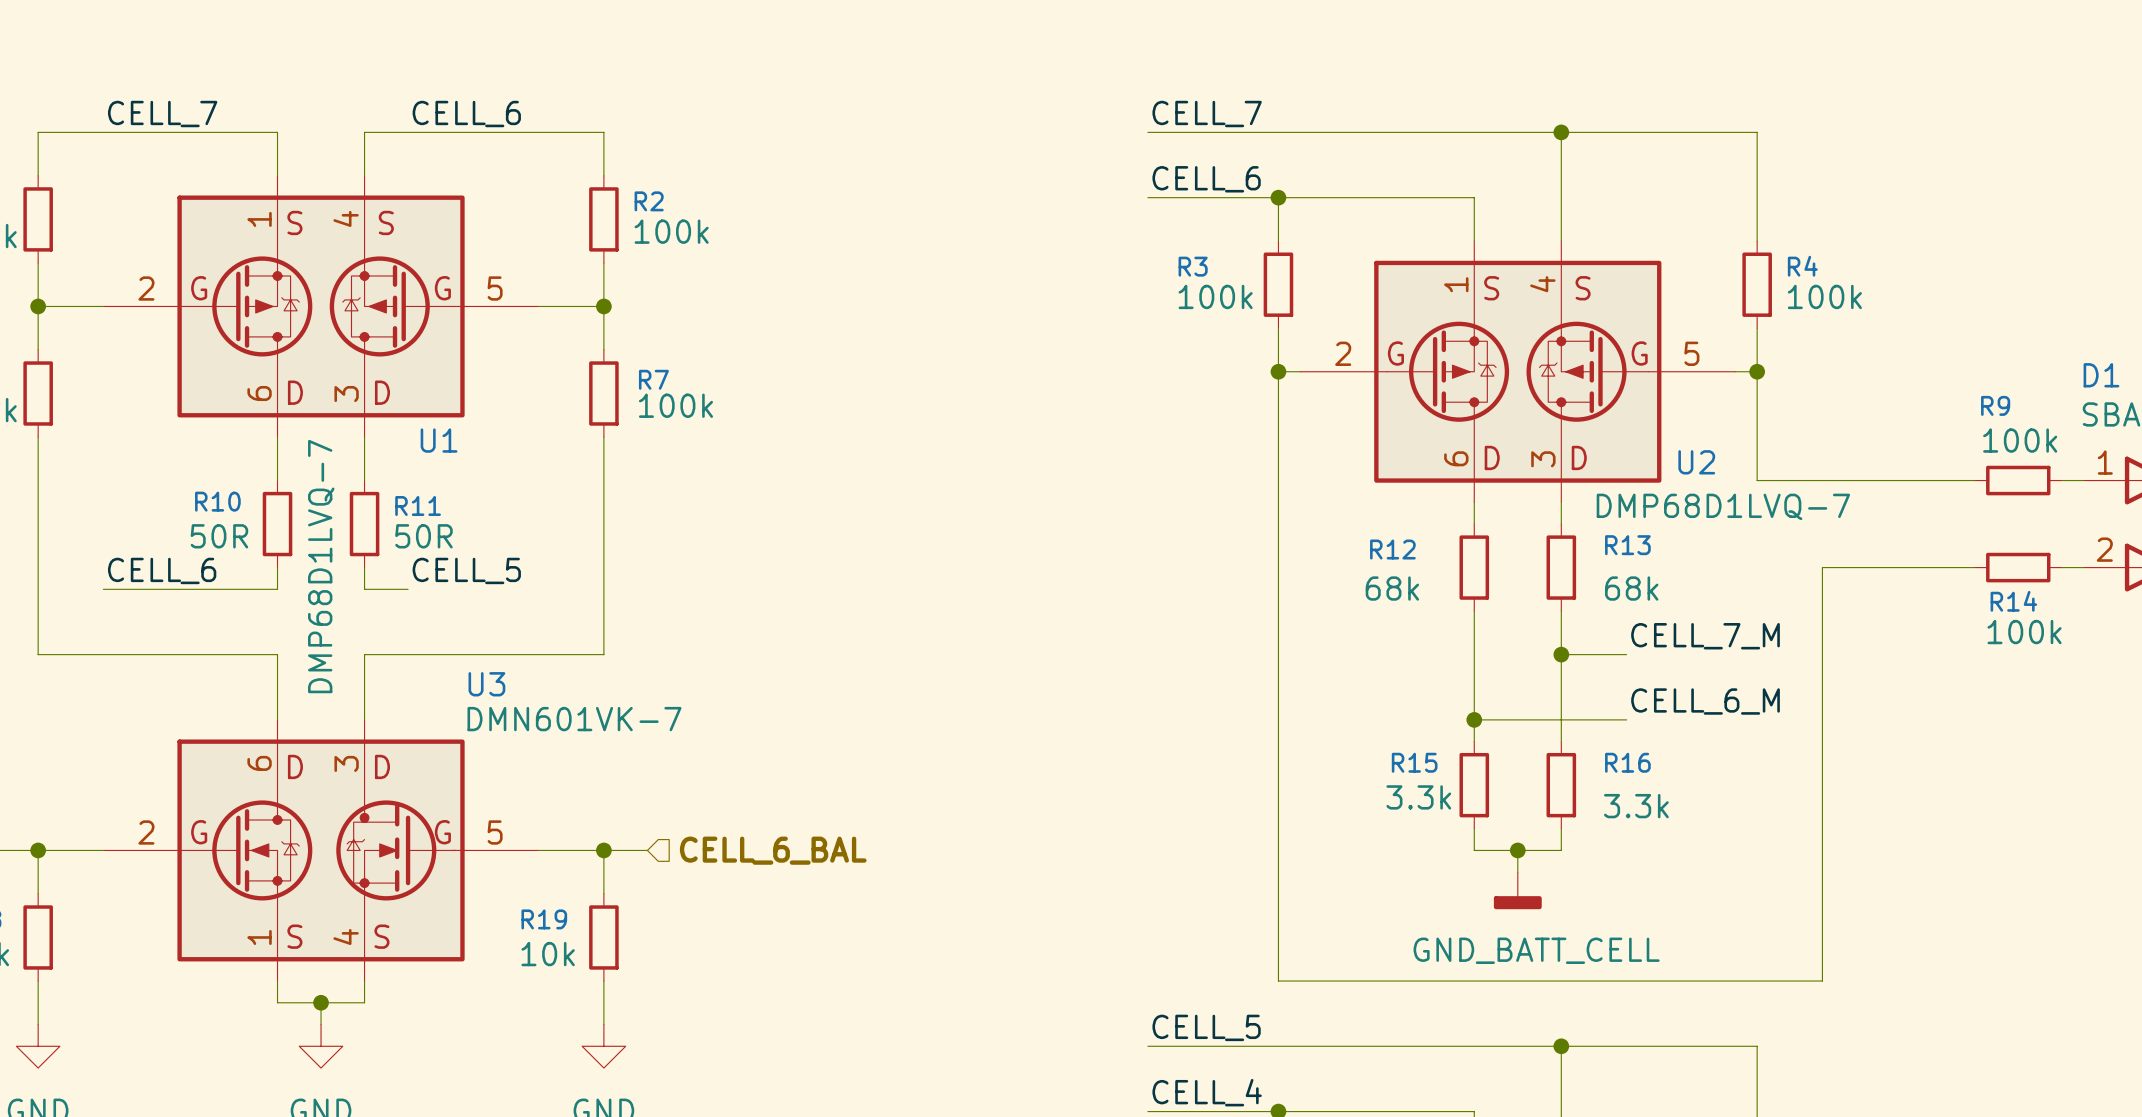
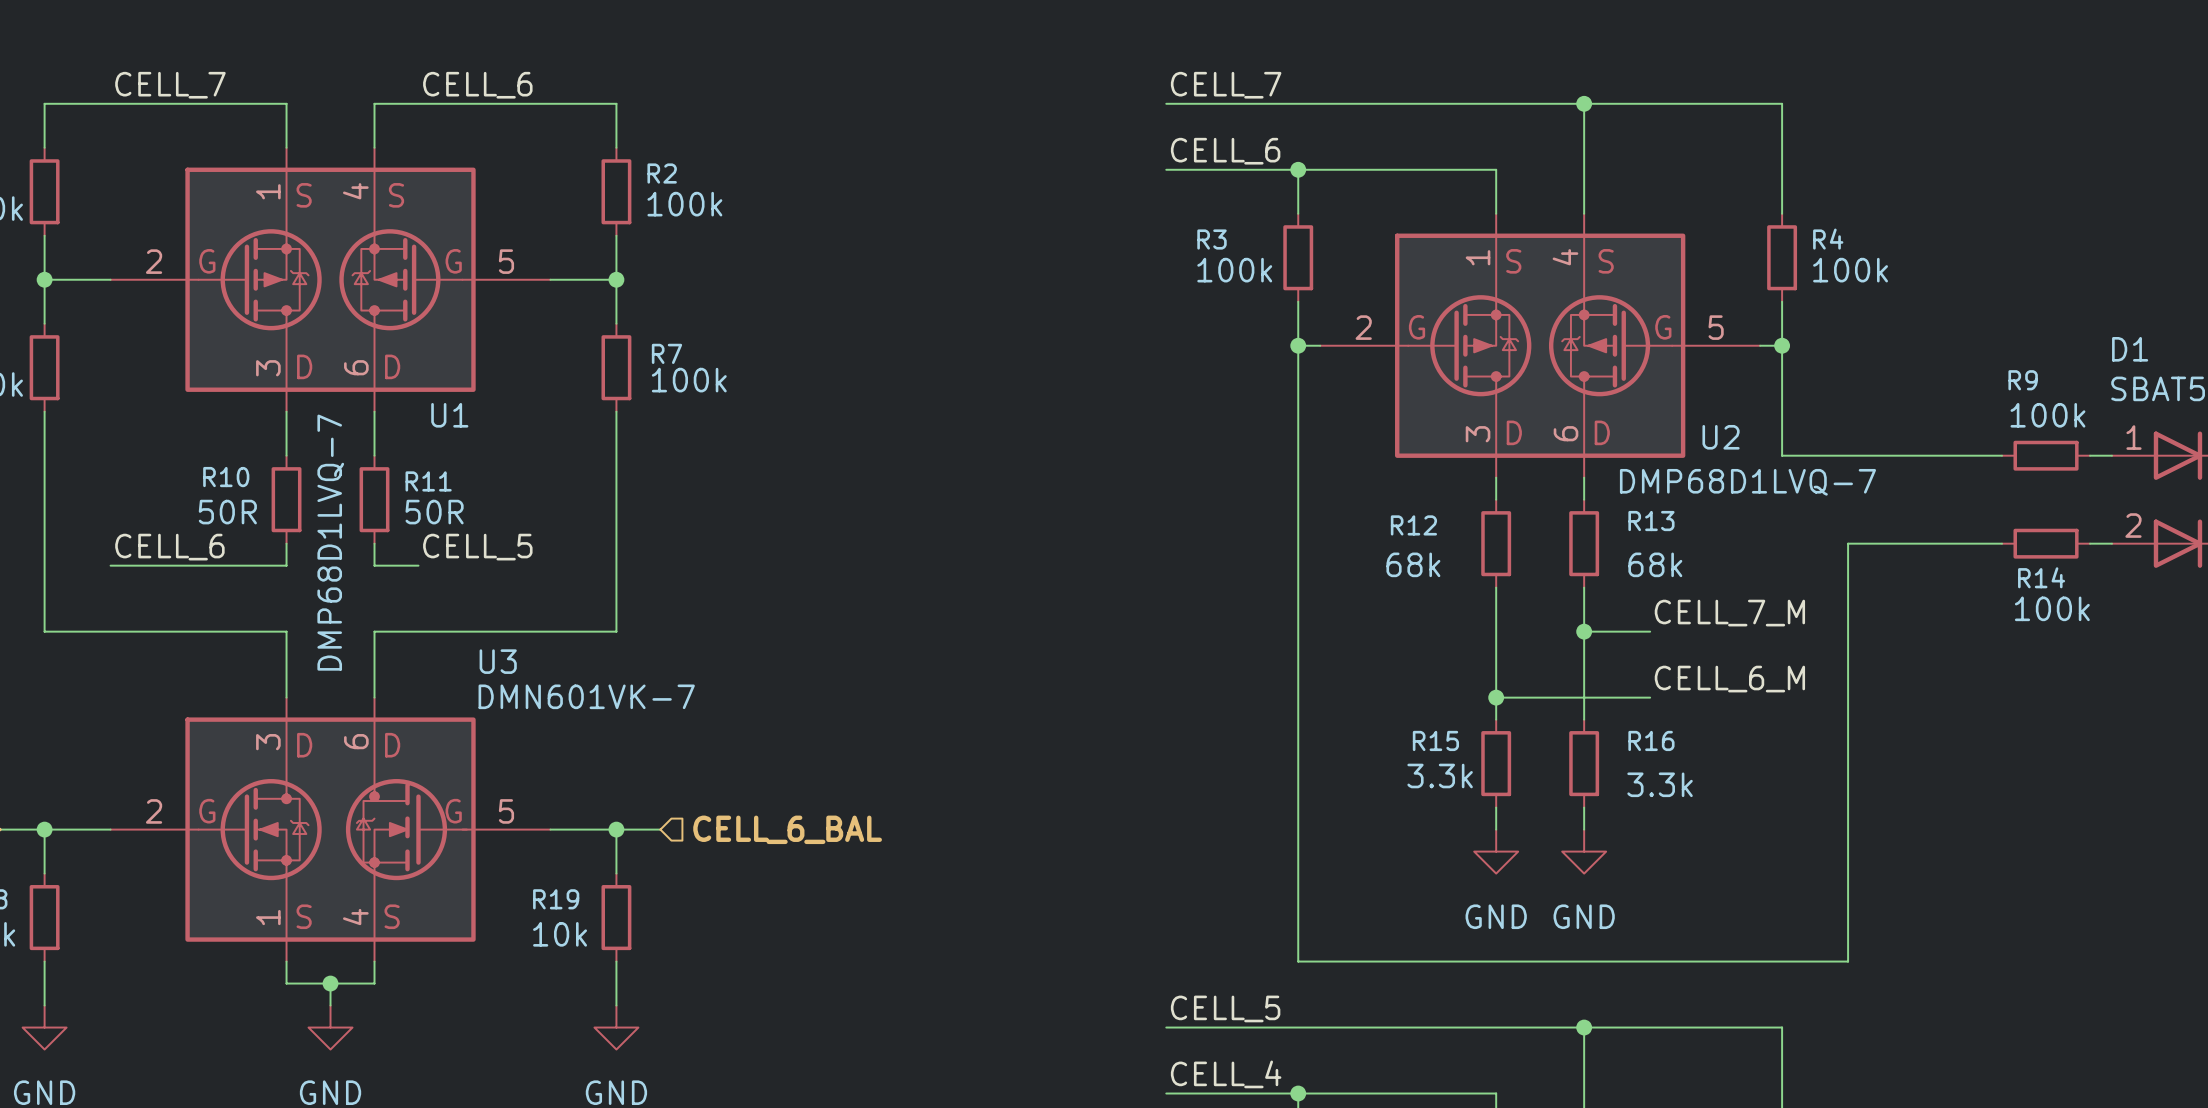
U1 pin number: 6 (259, 393) -> 3 (268, 368)
U1 pin number: 3 (346, 394) -> 6 (356, 367)
U2 pin number: 6 (1456, 458) -> 3 (1478, 434)
U2 pin number: 3 (1543, 459) -> 6 (1566, 433)
U3 pin number: 6 (259, 763) -> 3 (268, 742)
U3 pin number: 3 (346, 763) -> 6 (356, 741)
wire: (1474, 850) (1561, 850) -> none
wire: (1517, 850) (1517, 872) -> none
junction: (1517, 850) -> none
power symbol: none -> GND (1496, 851)
power symbol: none -> GND (1584, 851)
power symbol: GND_BATT_CELL (1517, 890) -> none

